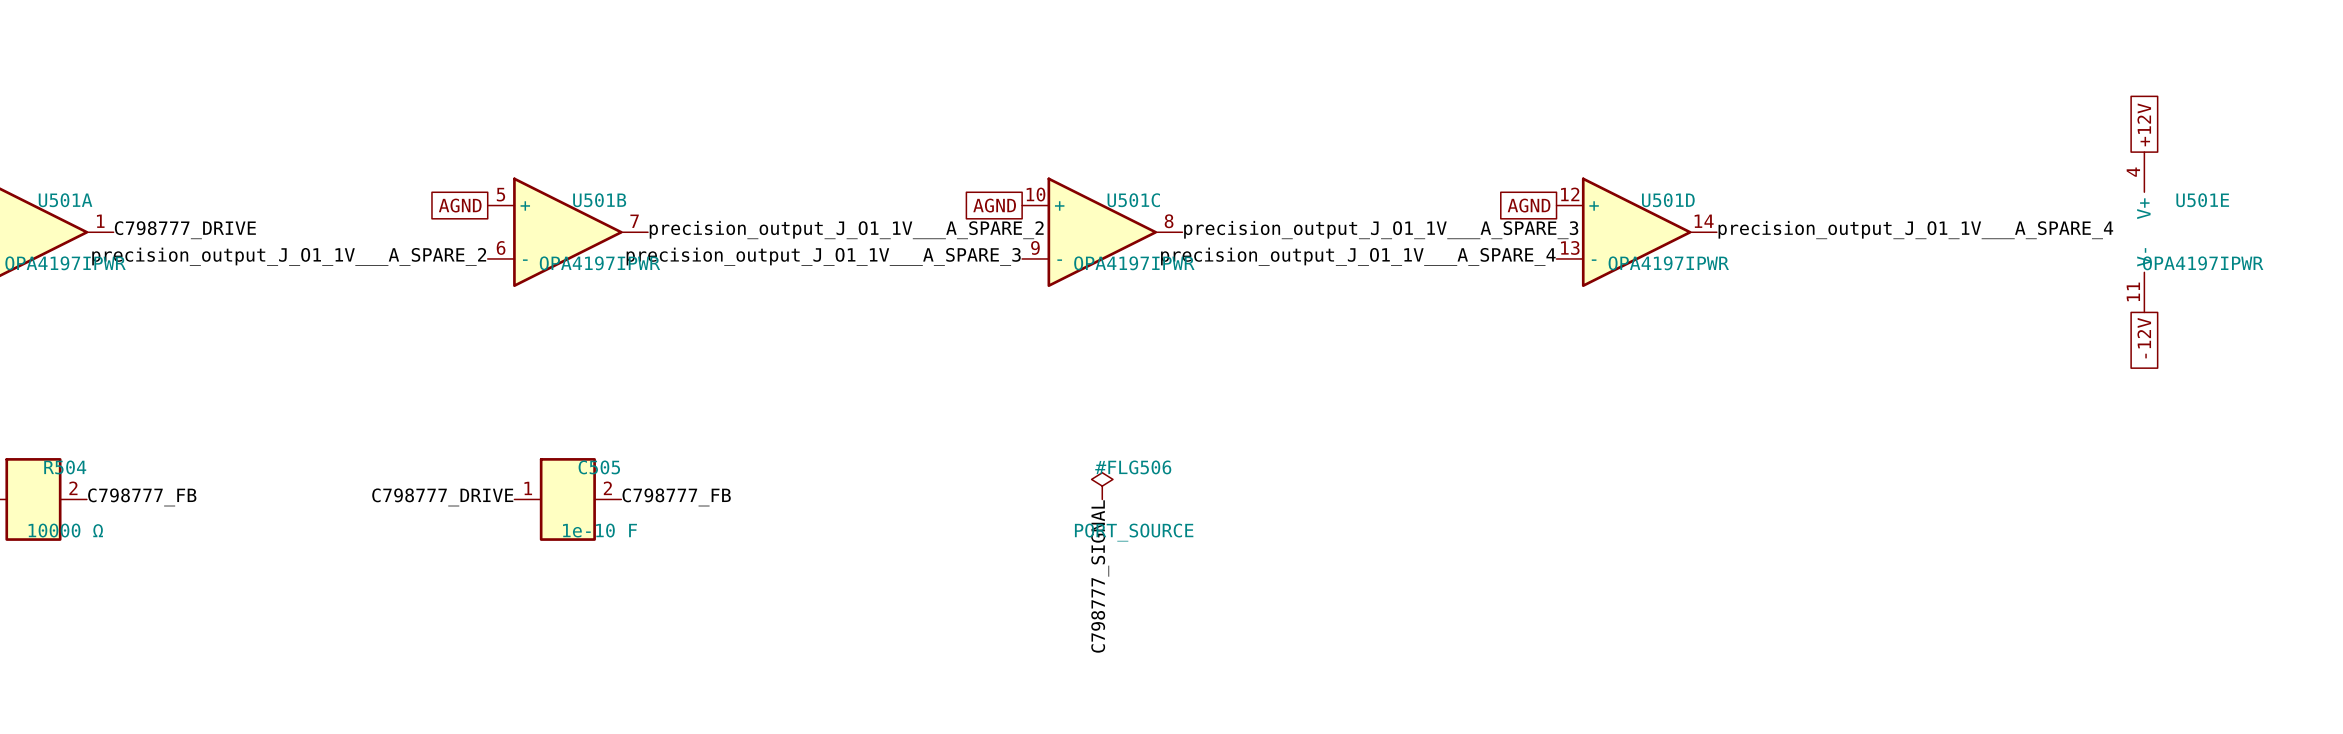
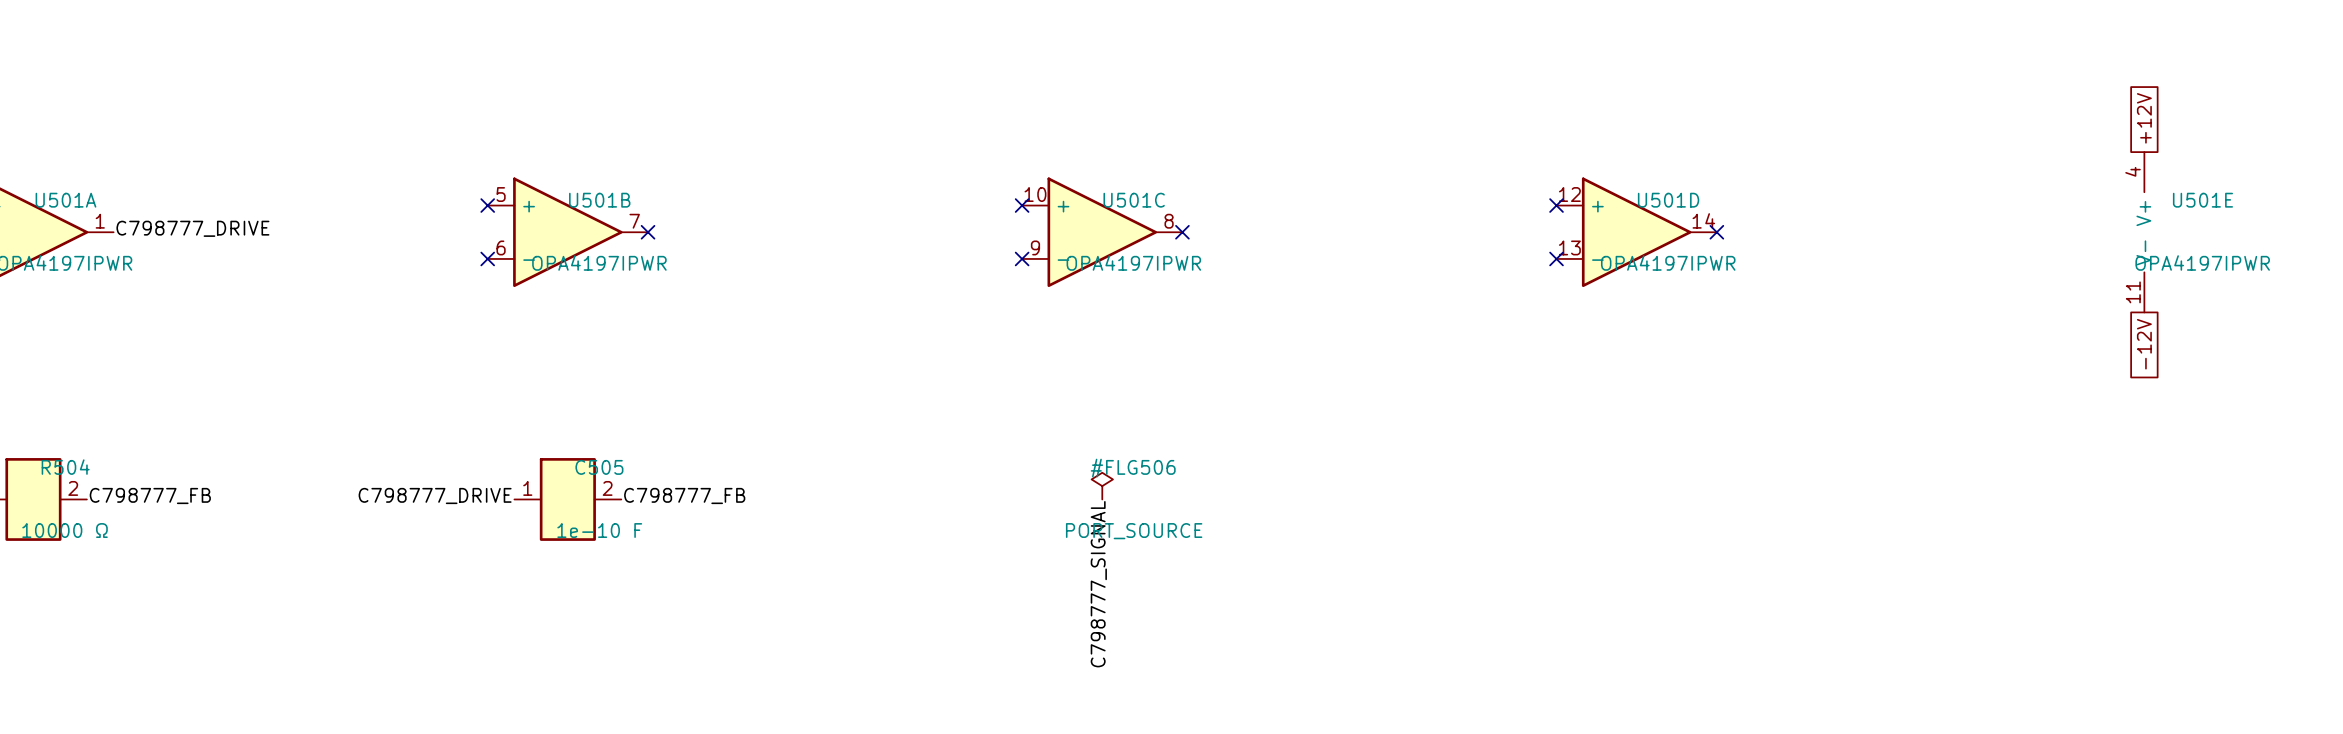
global label: AGND (460, 205) -> none
no-connect mark: none -> (487, 205)
global label: AGND (994, 205) -> none
no-connect mark: none -> (1022, 205)
global label: AGND (1529, 205) -> none
no-connect mark: none -> (1556, 205)
label: precision_output_J_O1_1V___A_SPARE_2 (846, 230) -> none
label: precision_output_J_O1_1V___A_SPARE_3 (1381, 230) -> none
label: precision_output_J_O1_1V___A_SPARE_4 (1915, 230) -> none
no-connect mark: none -> (648, 232)
no-connect mark: none -> (1182, 232)
no-connect mark: none -> (1716, 232)
label: precision_output_J_O1_1V___A_SPARE_2 (289, 256) -> none
label: precision_output_J_O1_1V___A_SPARE_3 (823, 256) -> none
label: precision_output_J_O1_1V___A_SPARE_4 (1358, 256) -> none
no-connect mark: none -> (487, 258)
no-connect mark: none -> (1022, 258)
no-connect mark: none -> (1556, 258)

